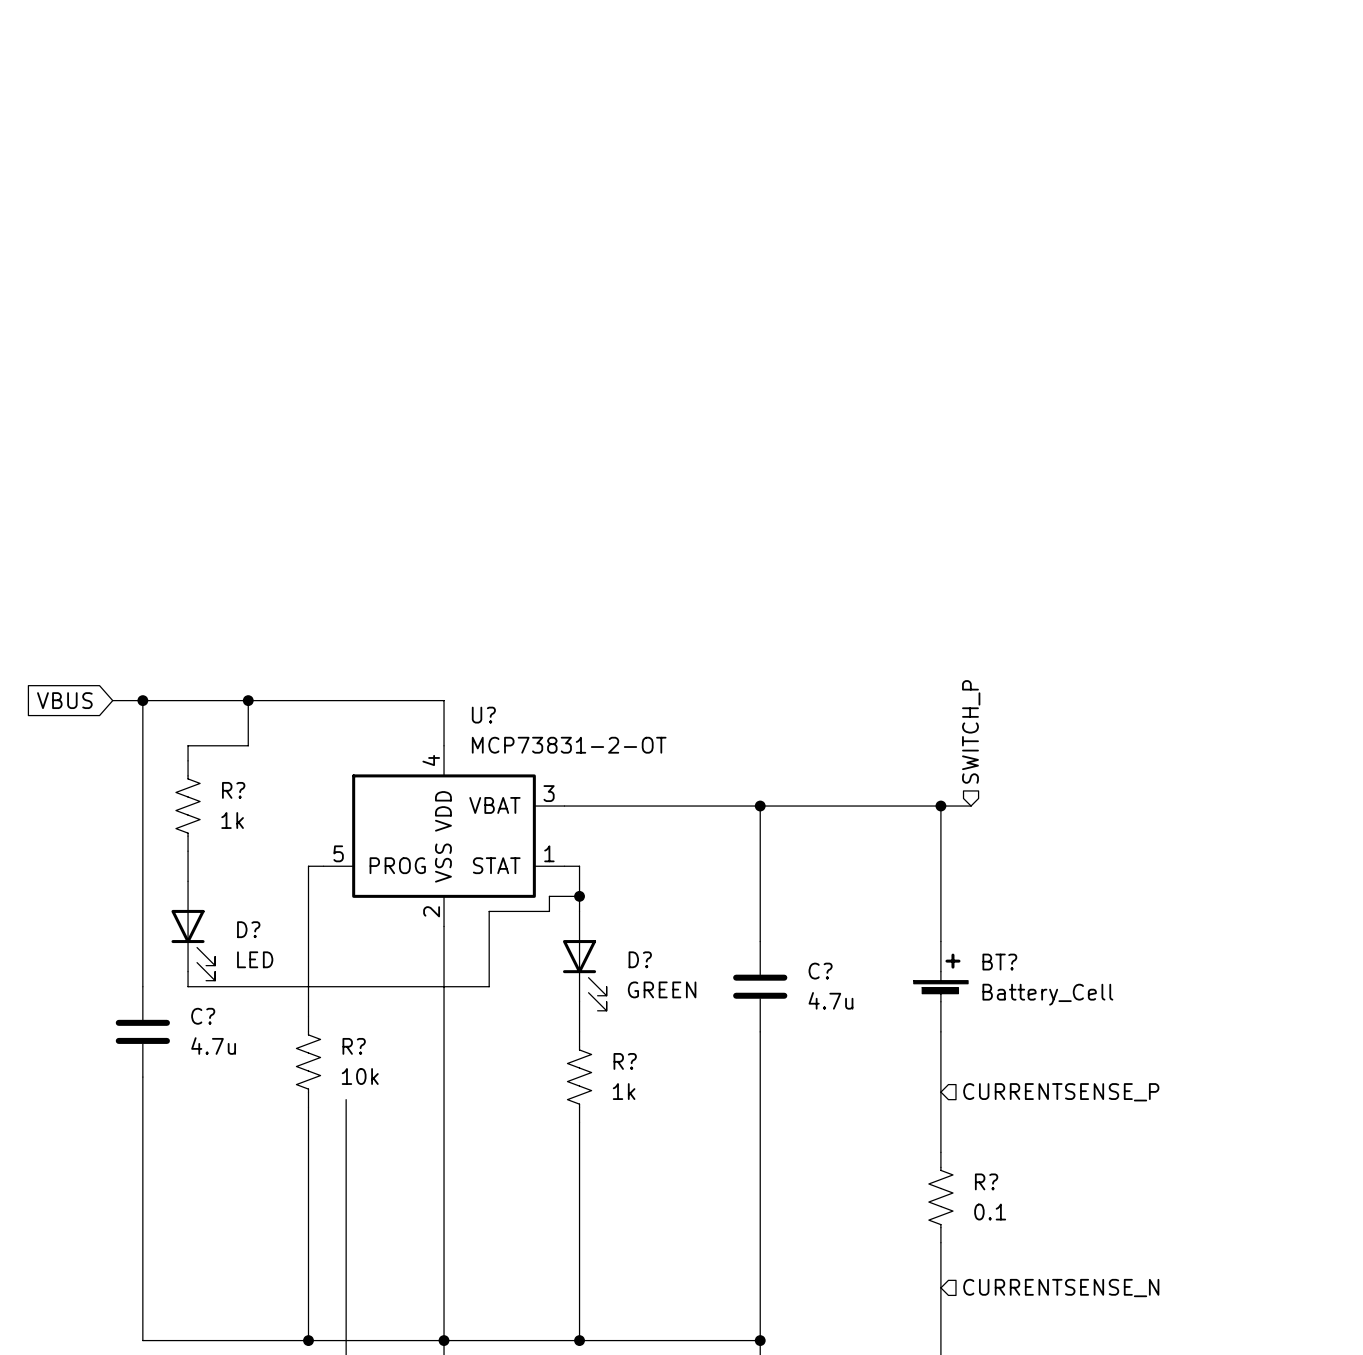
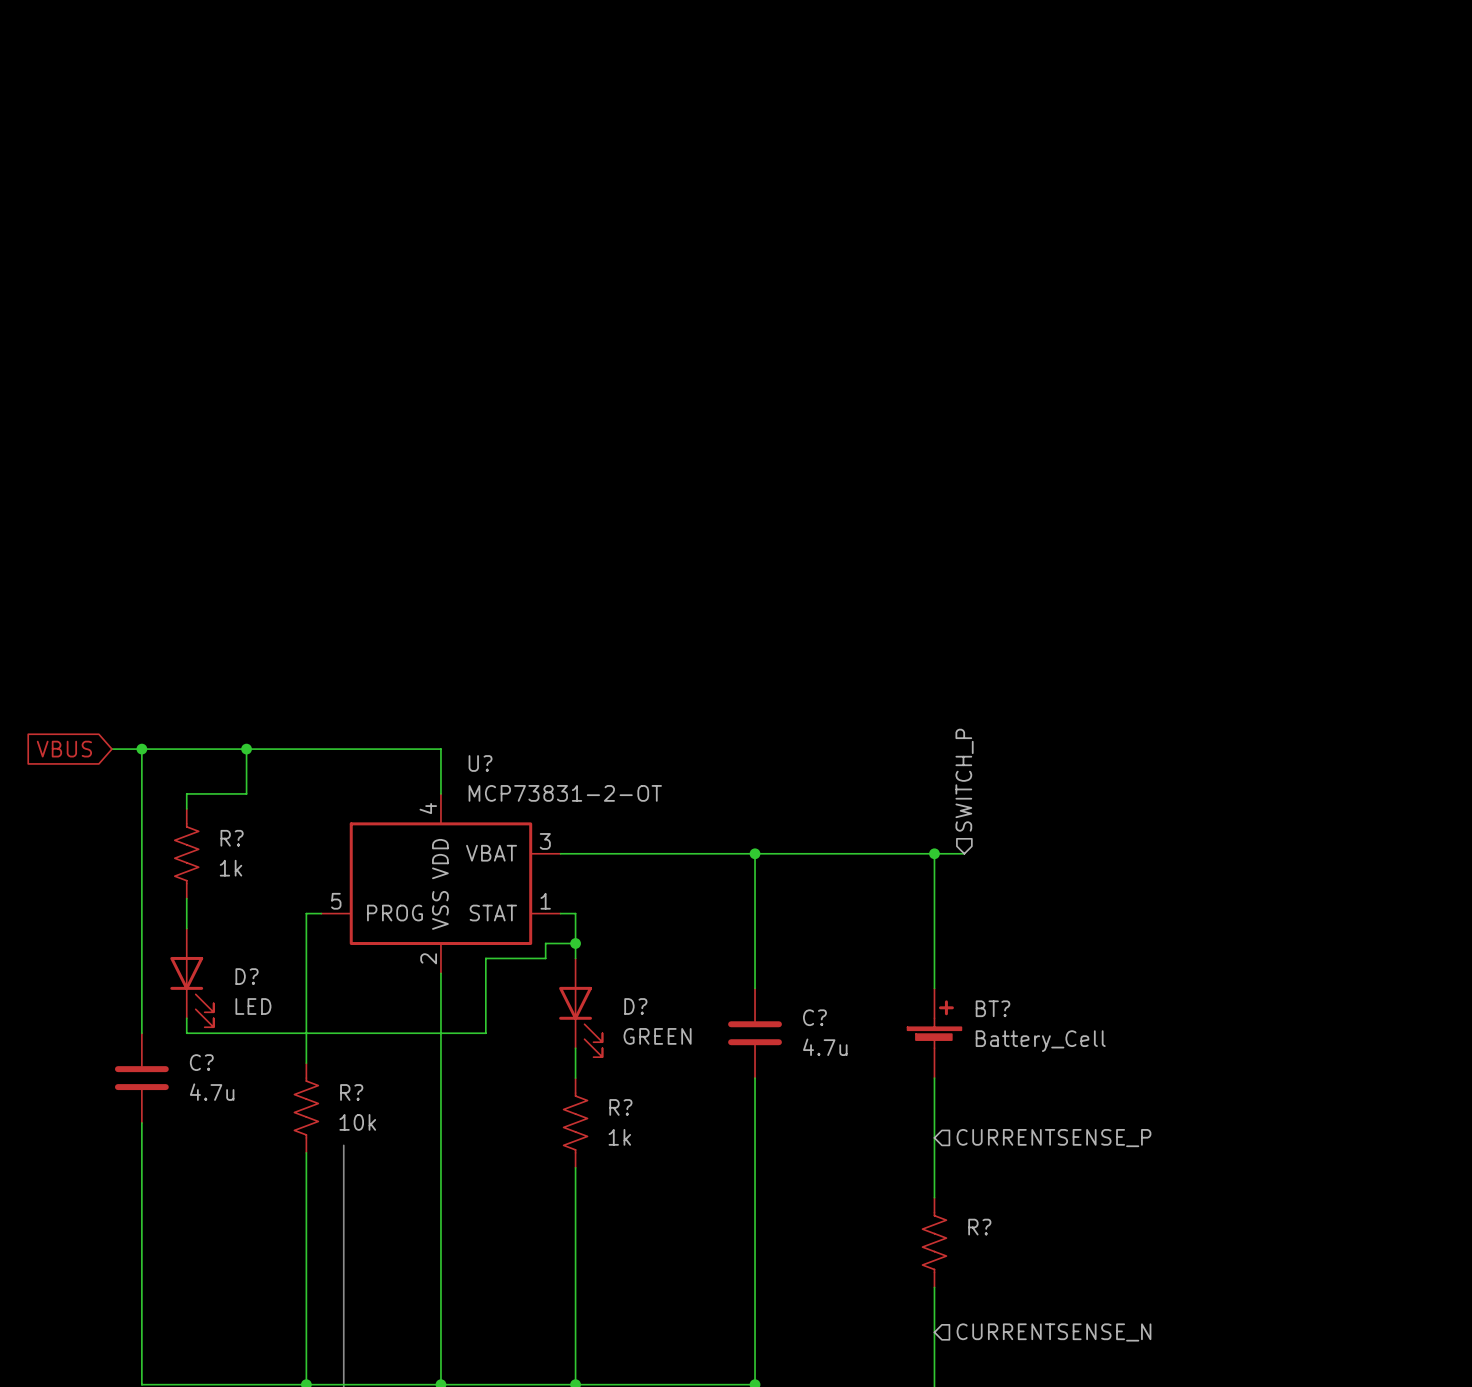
R? value: 0.1 (990, 1212) -> none

